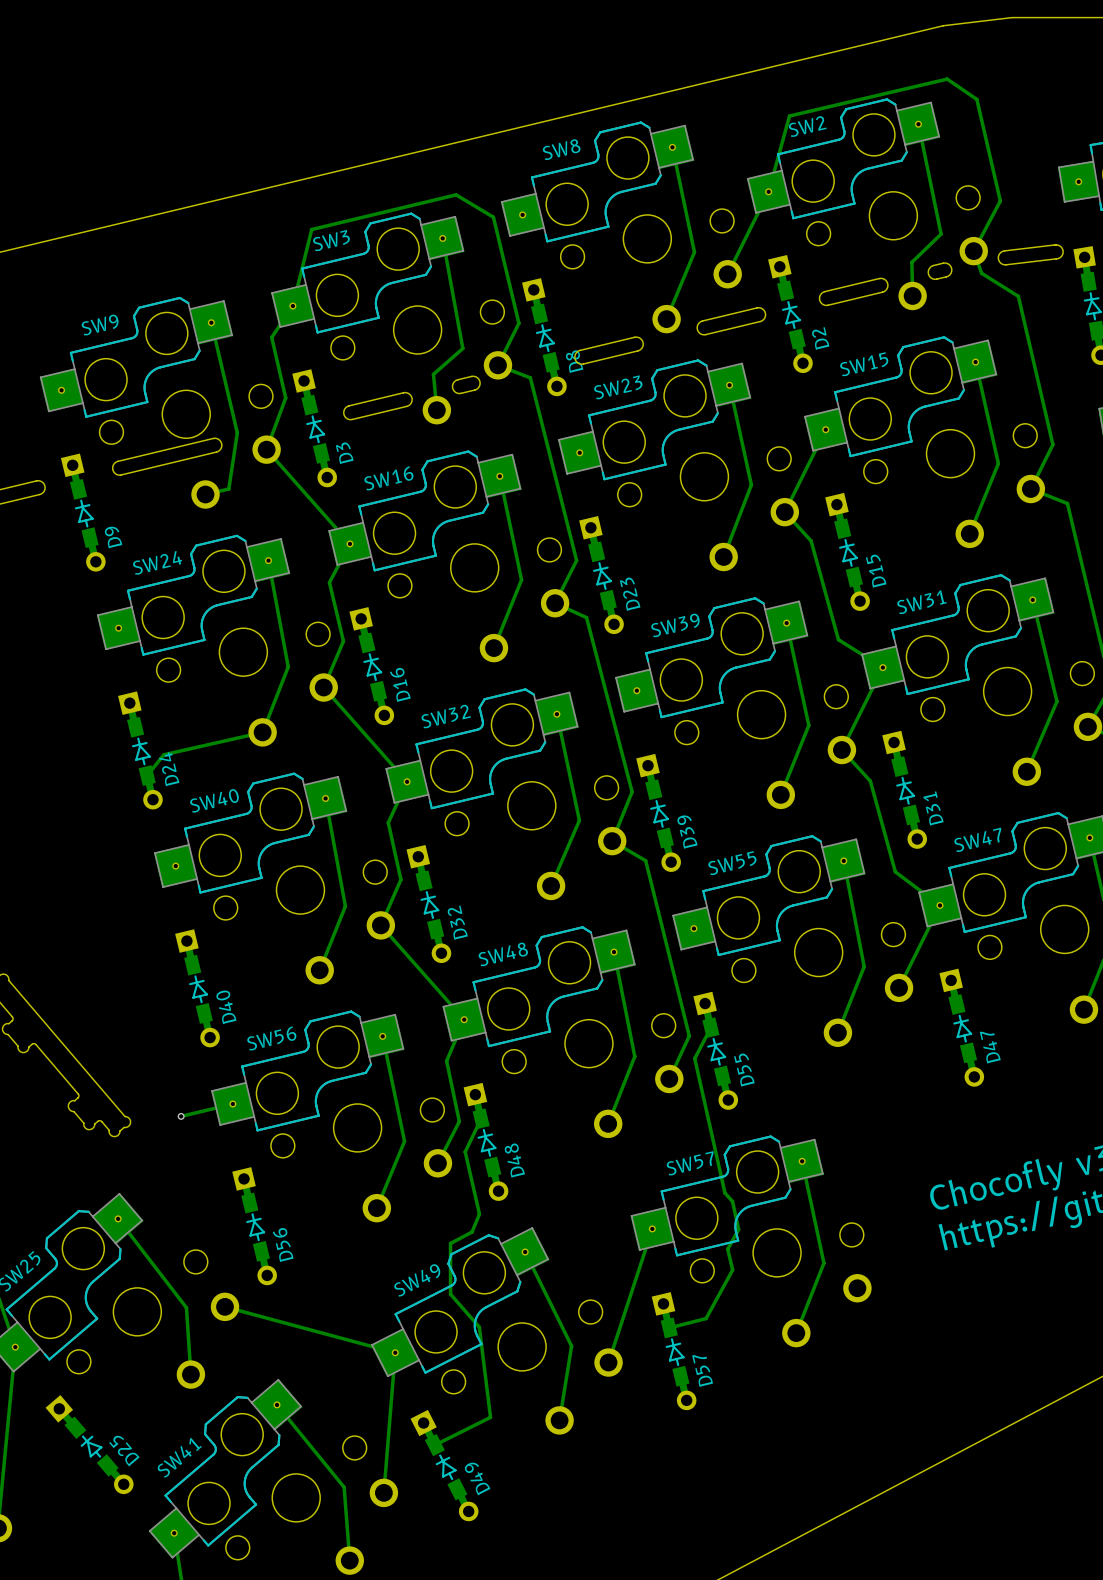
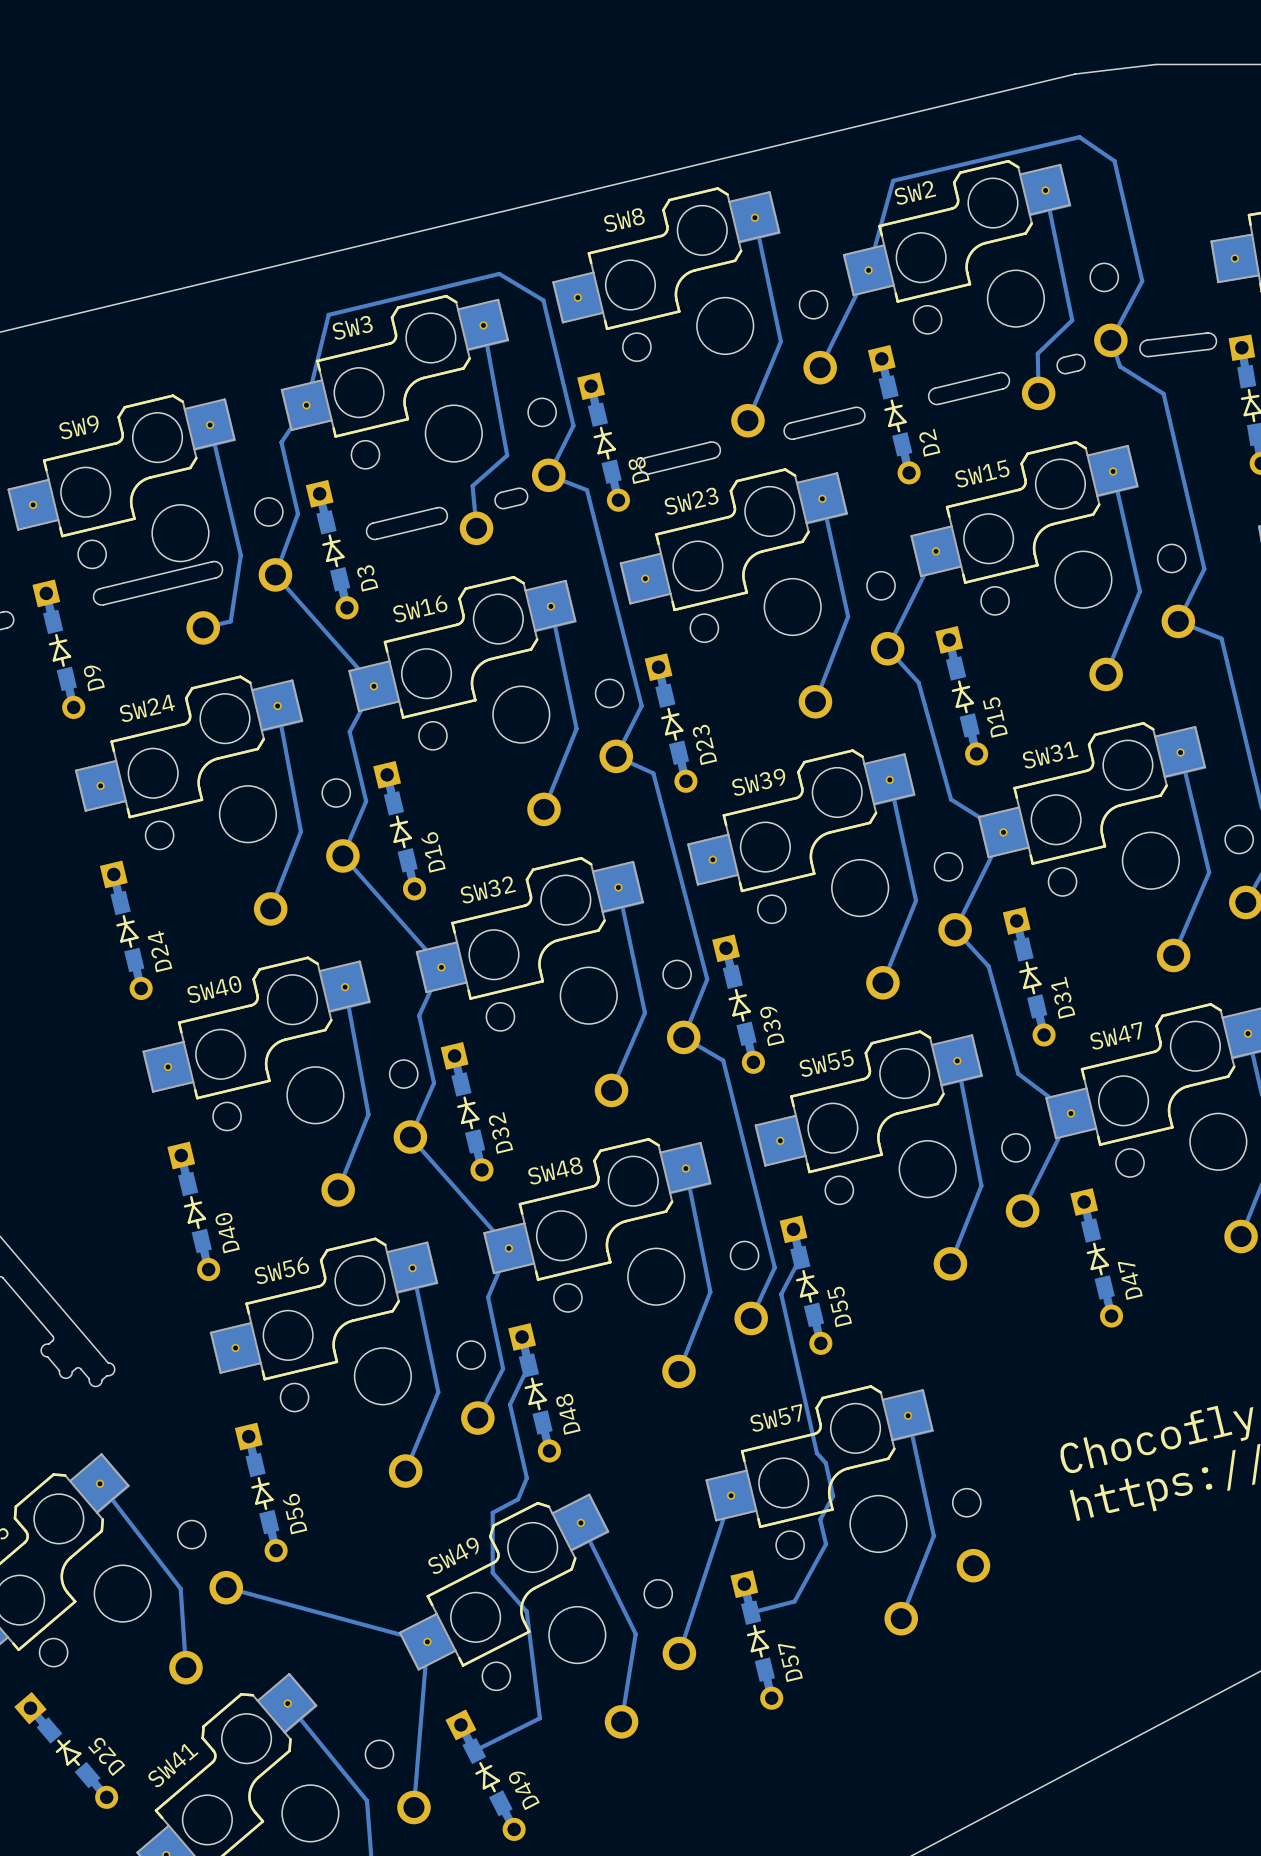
track: (262, 732) (163, 754) (147, 775) -> none
track: (232, 1103) (181, 1116) -> none
via: (181, 1116) -> none

